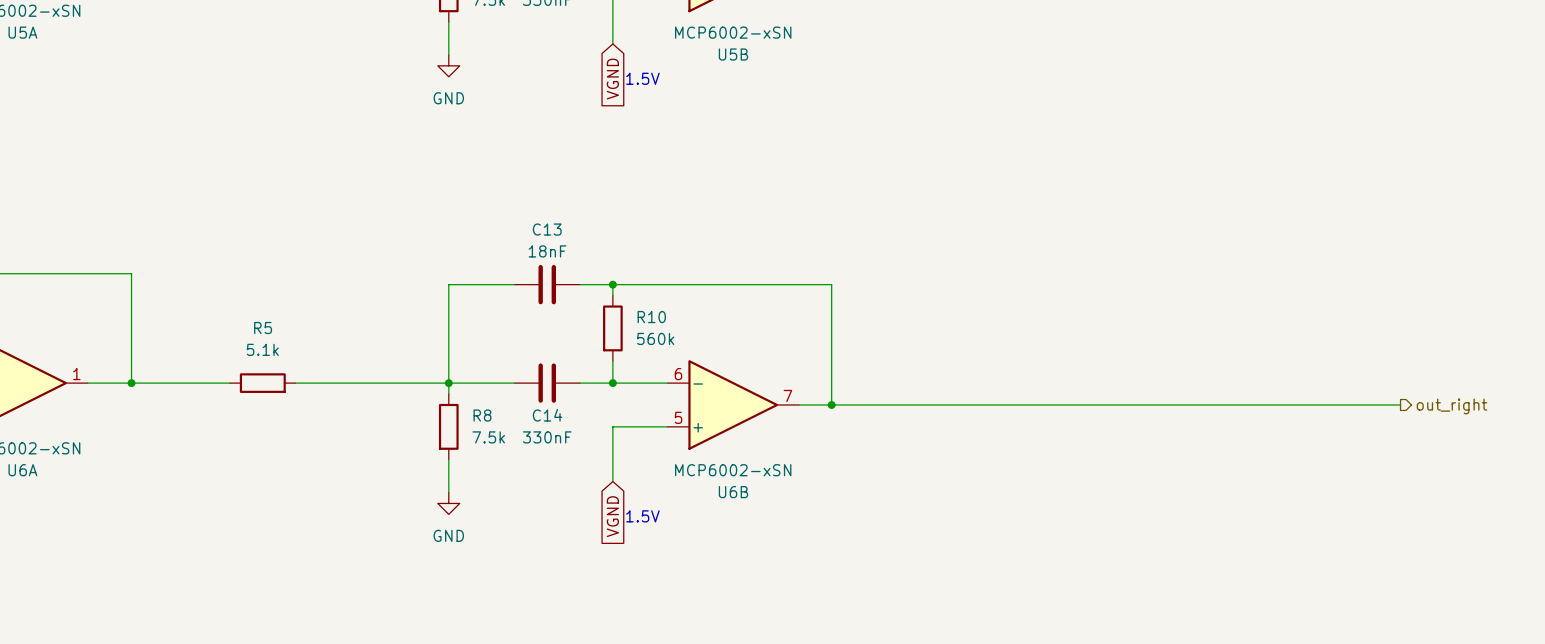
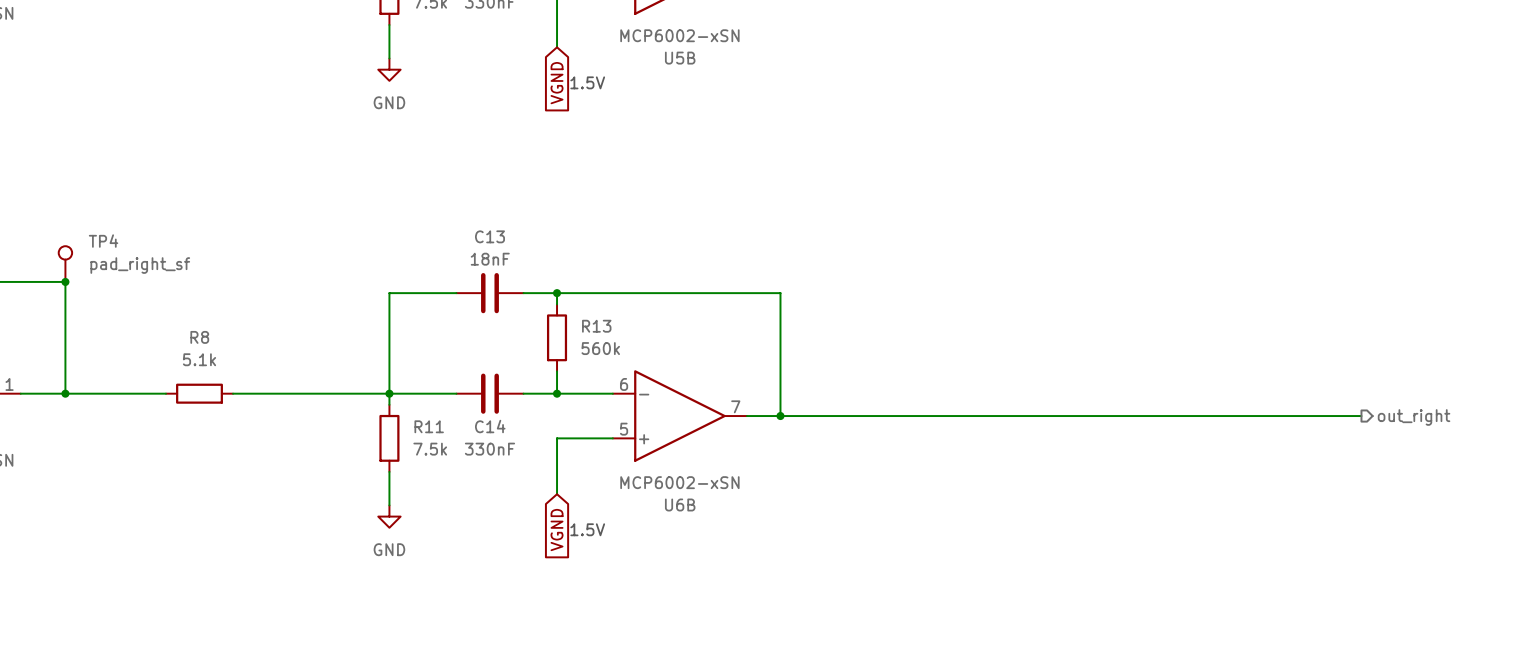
TP4: none -> pad_right_sf (65, 264)
junction: none -> (65, 281)
R10 name: R10 (651, 317) -> R13 (596, 326)
R5 name: R5 (263, 328) -> R8 (199, 337)
R8 name: R8 (482, 415) -> R11 (429, 426)

